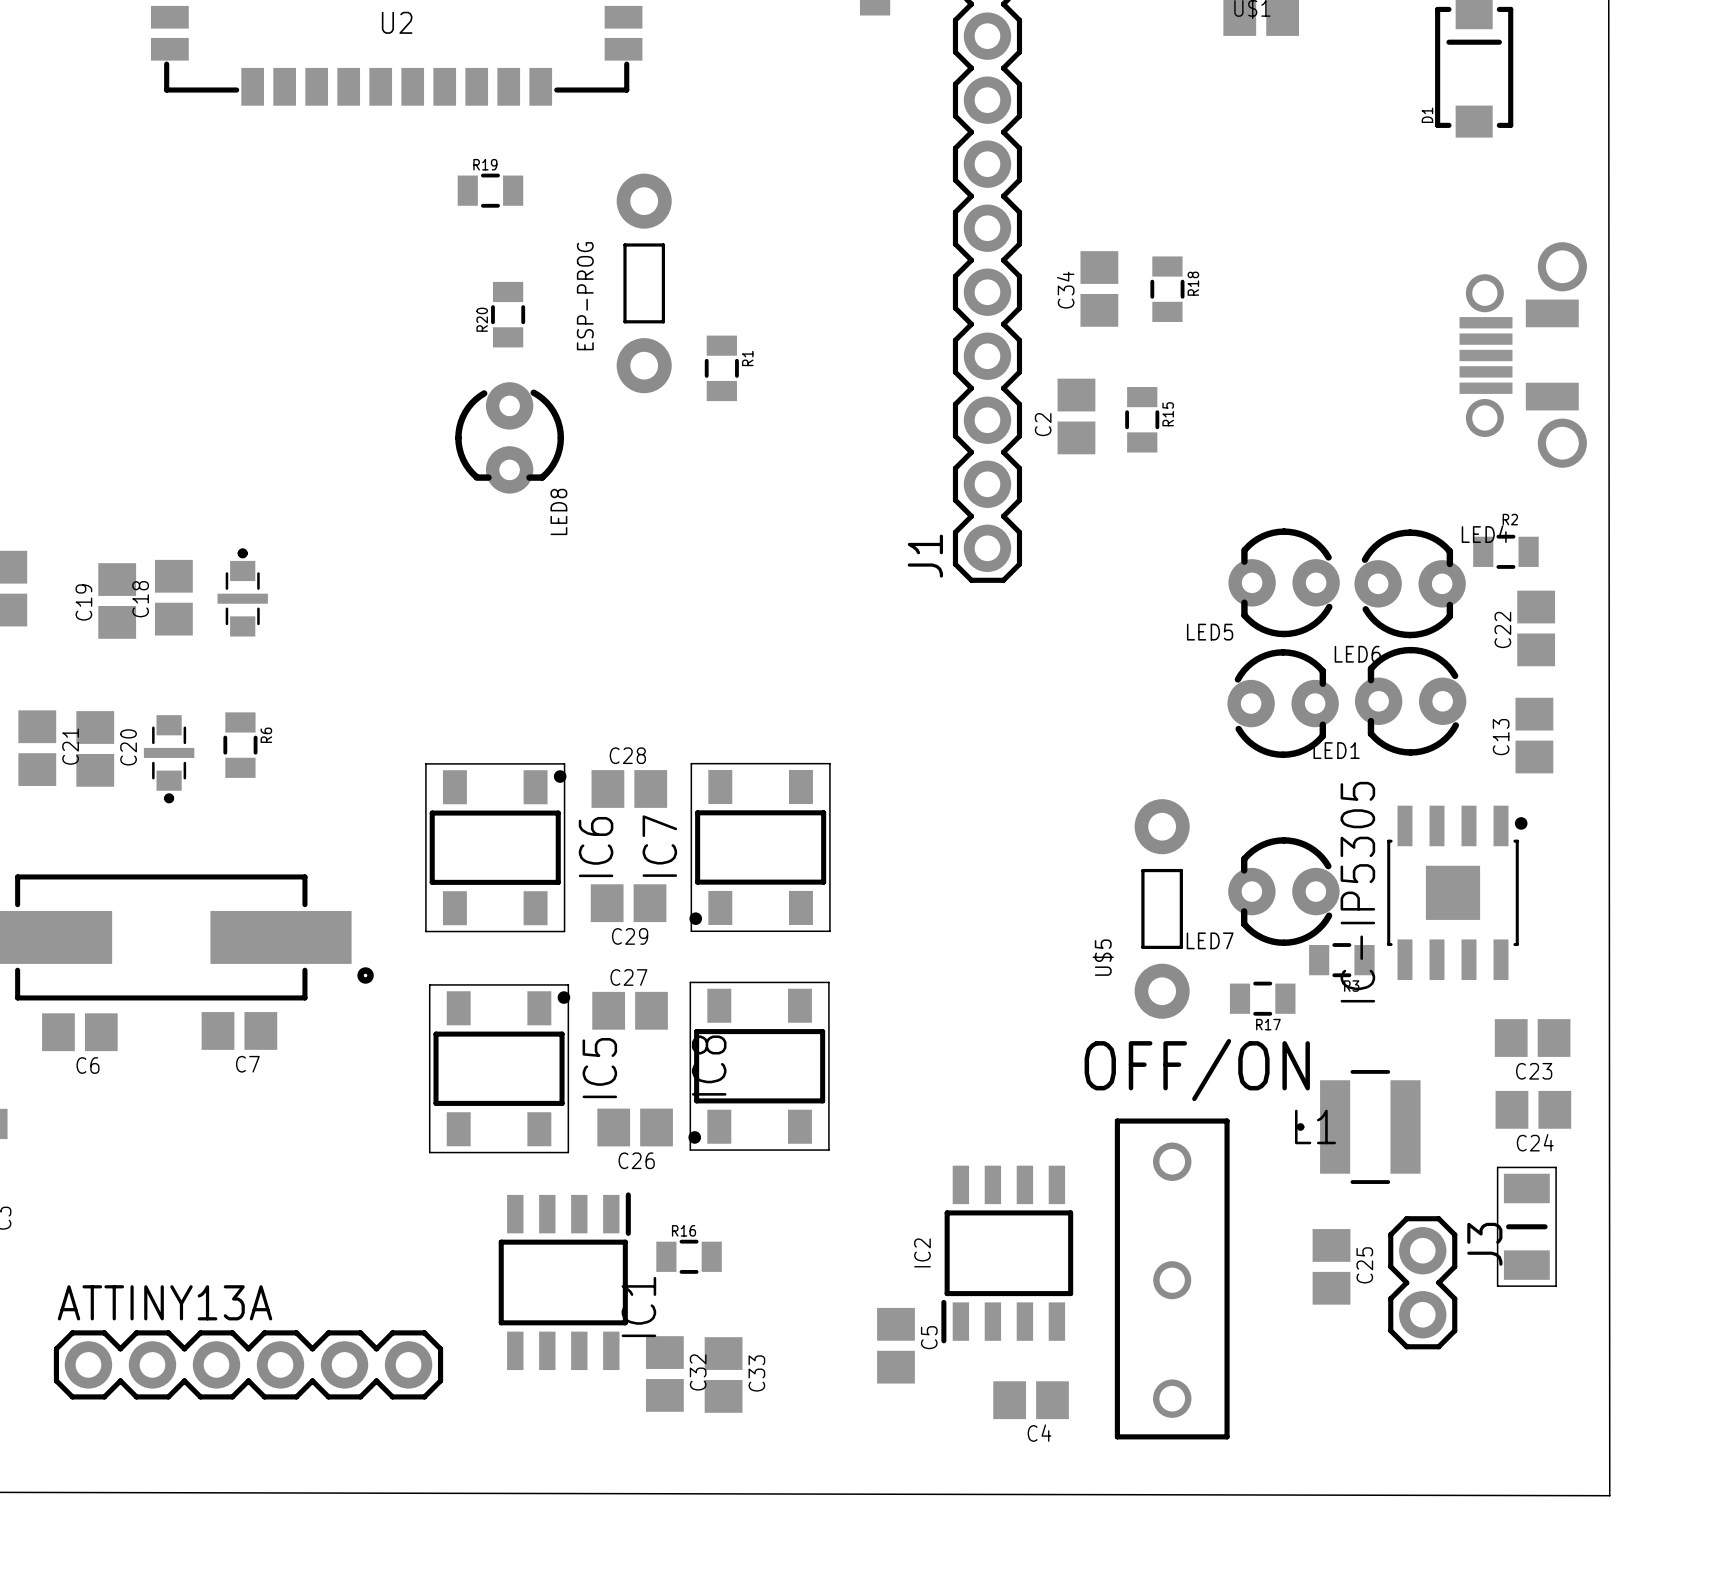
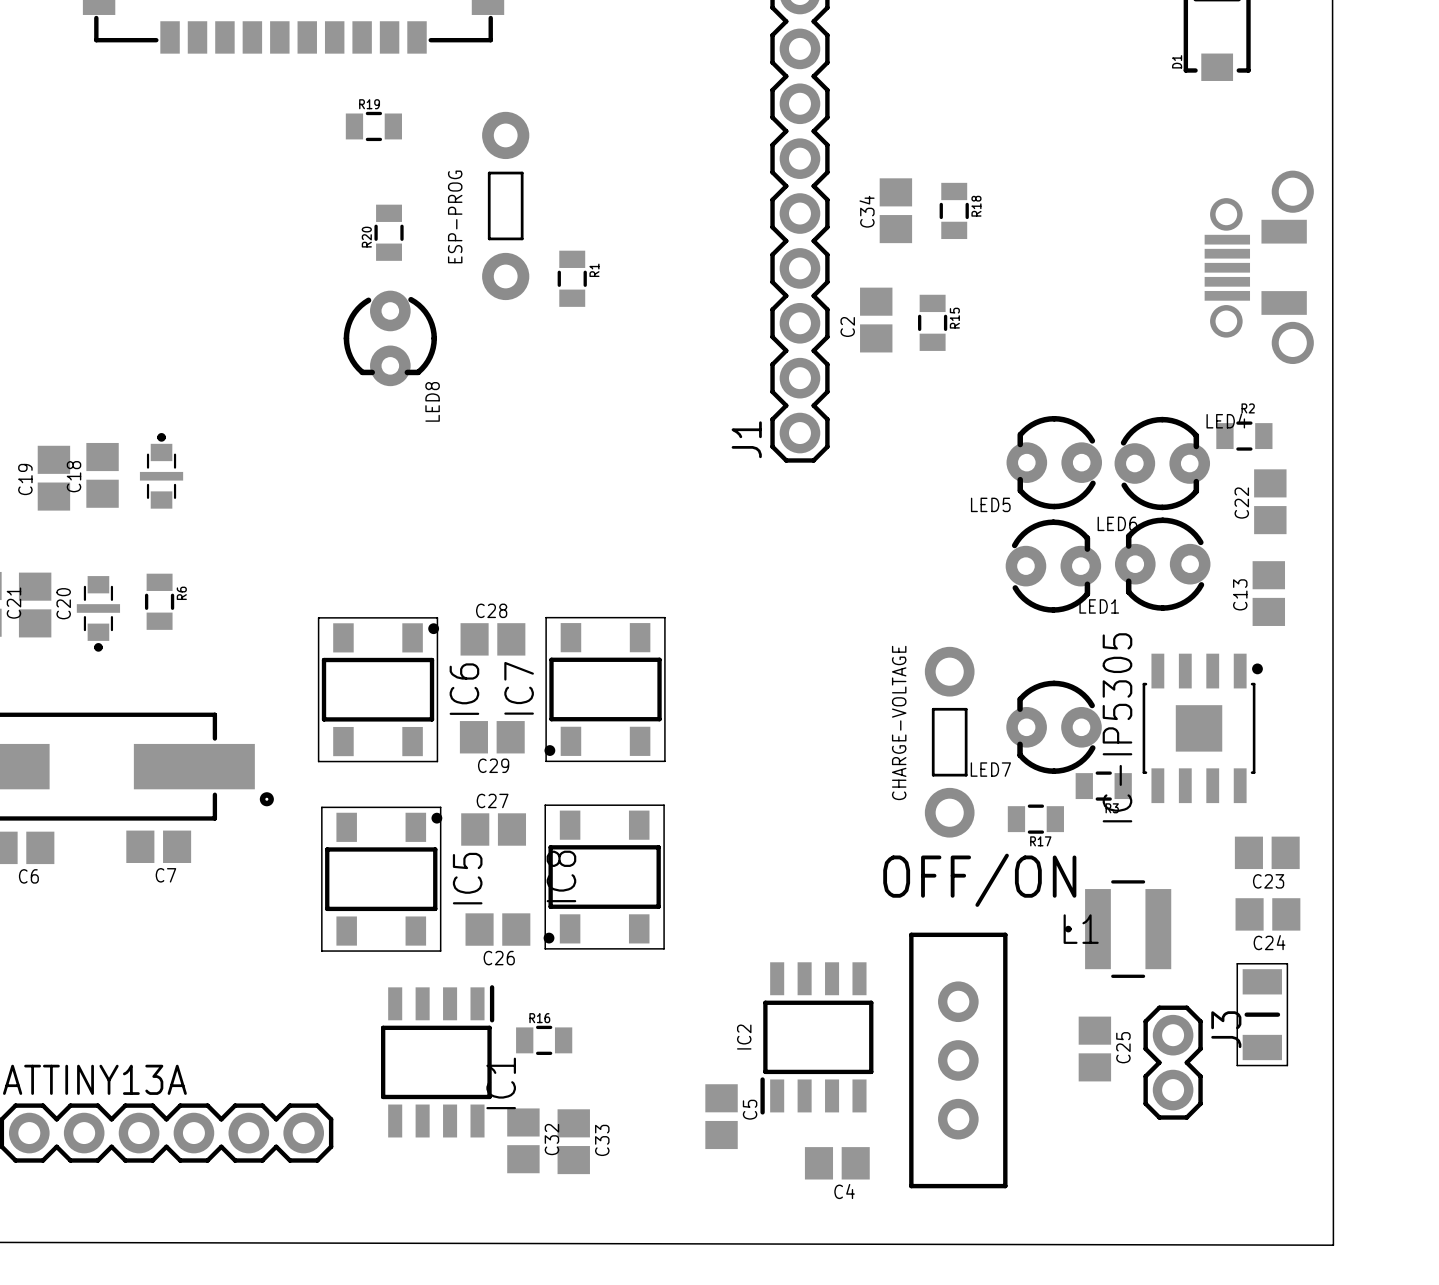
U$5: (1162, 908) -> none
CHARGE-VOLTAGE: none -> (949, 742)
OFF/ON footprint: [1114, 1118, 1230, 1440] -> [909, 932, 1008, 1189]

